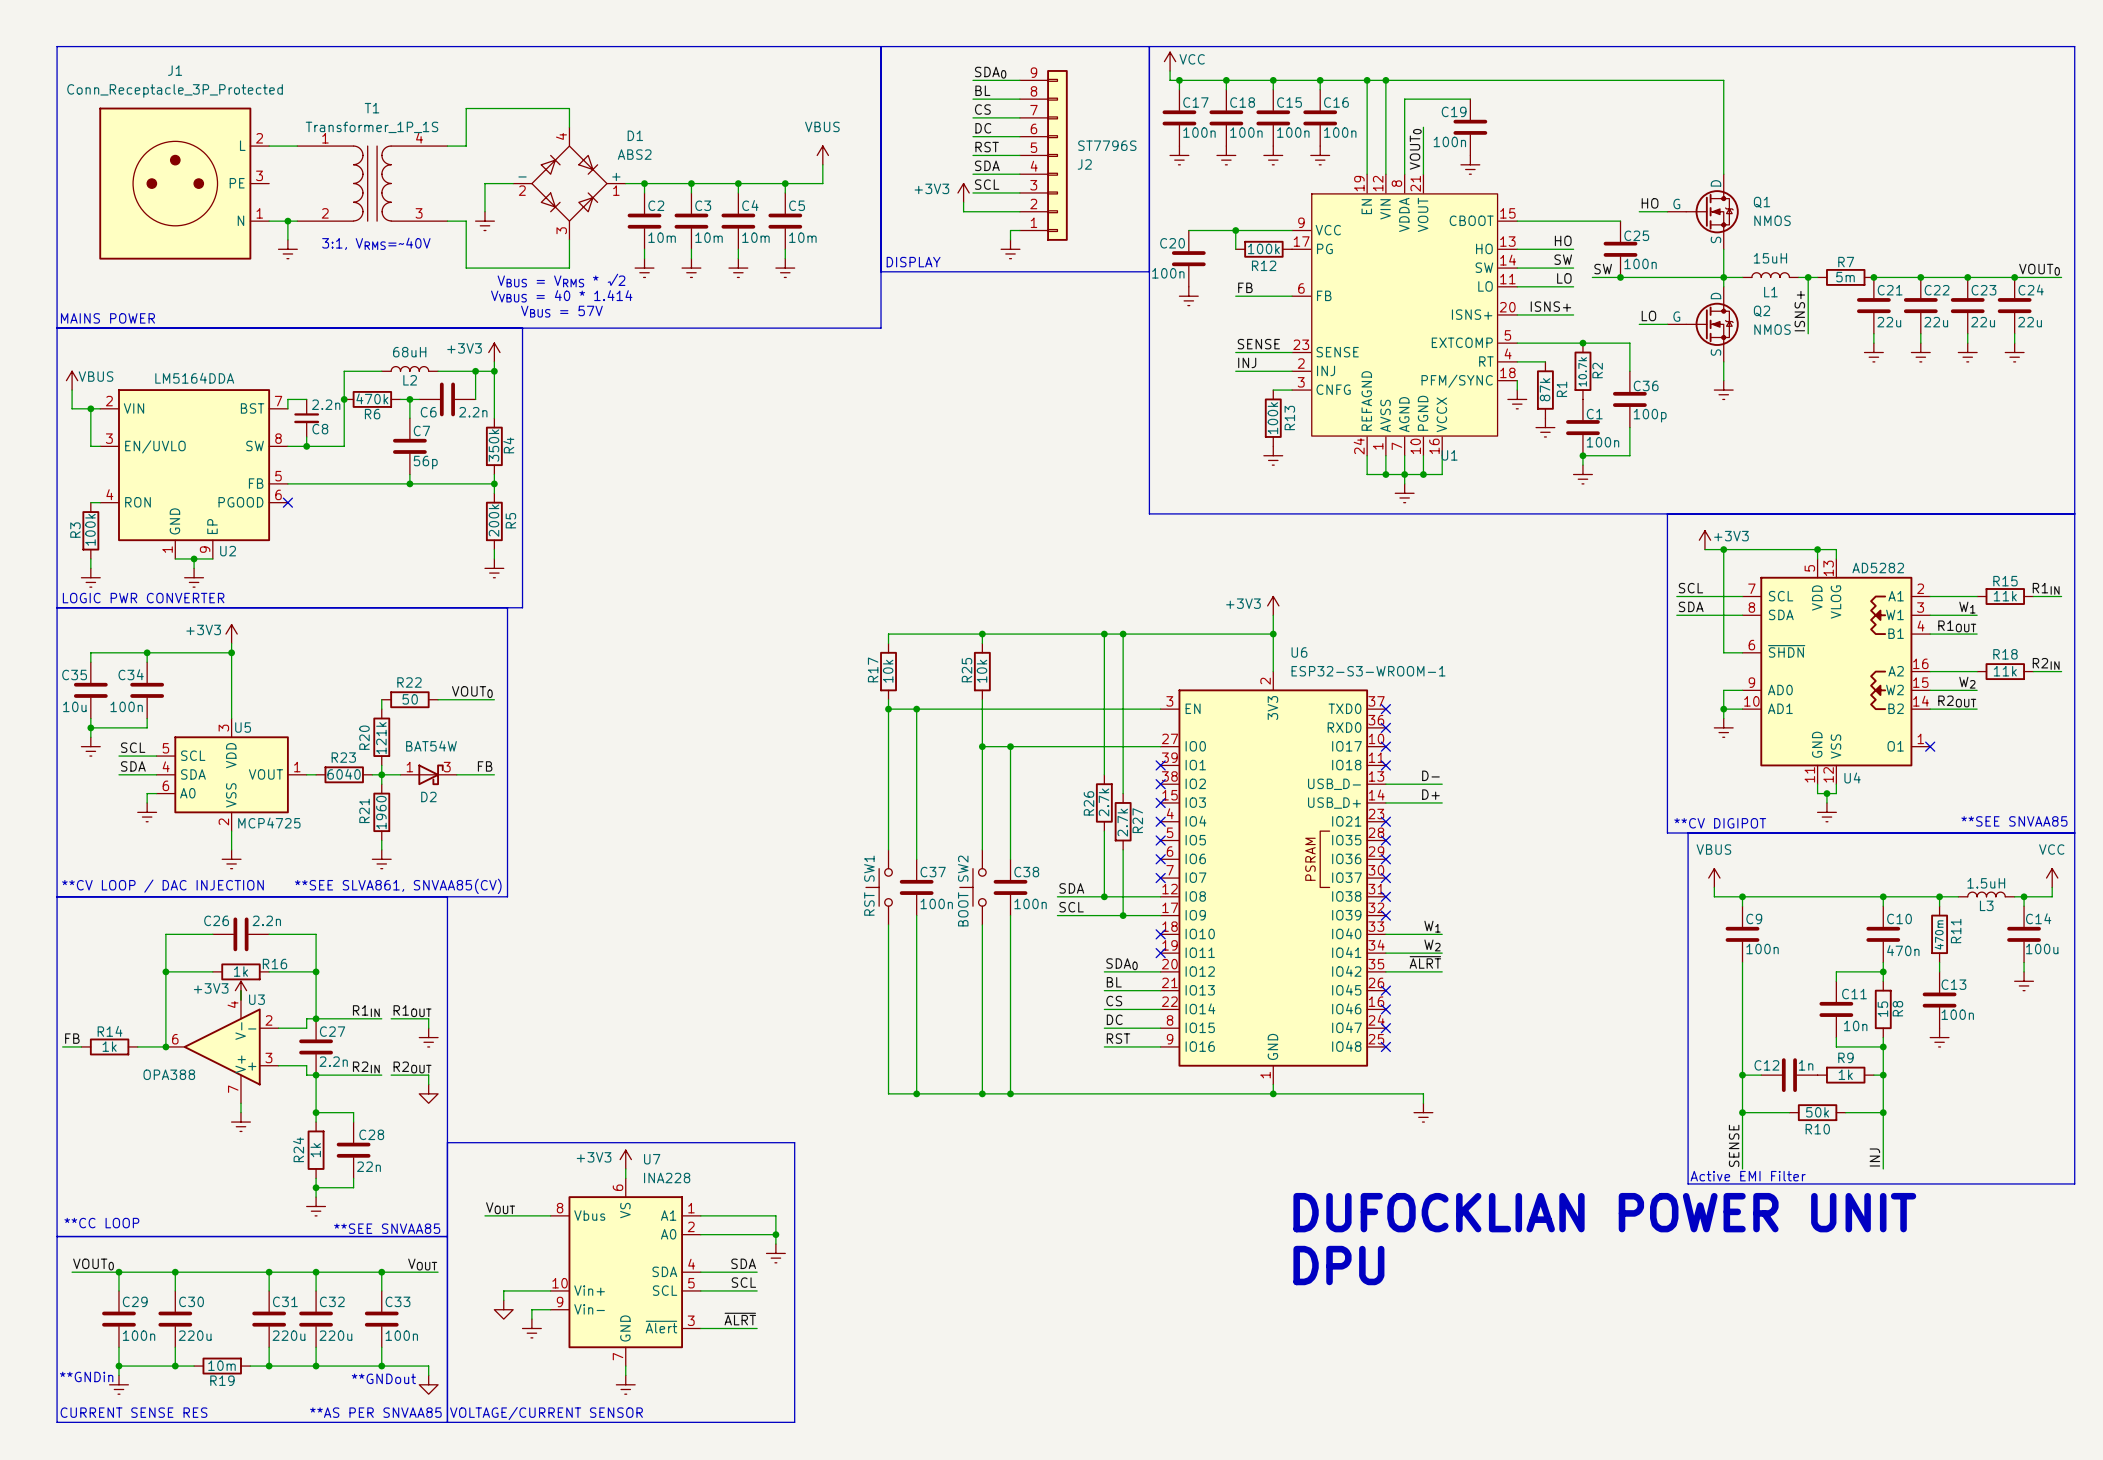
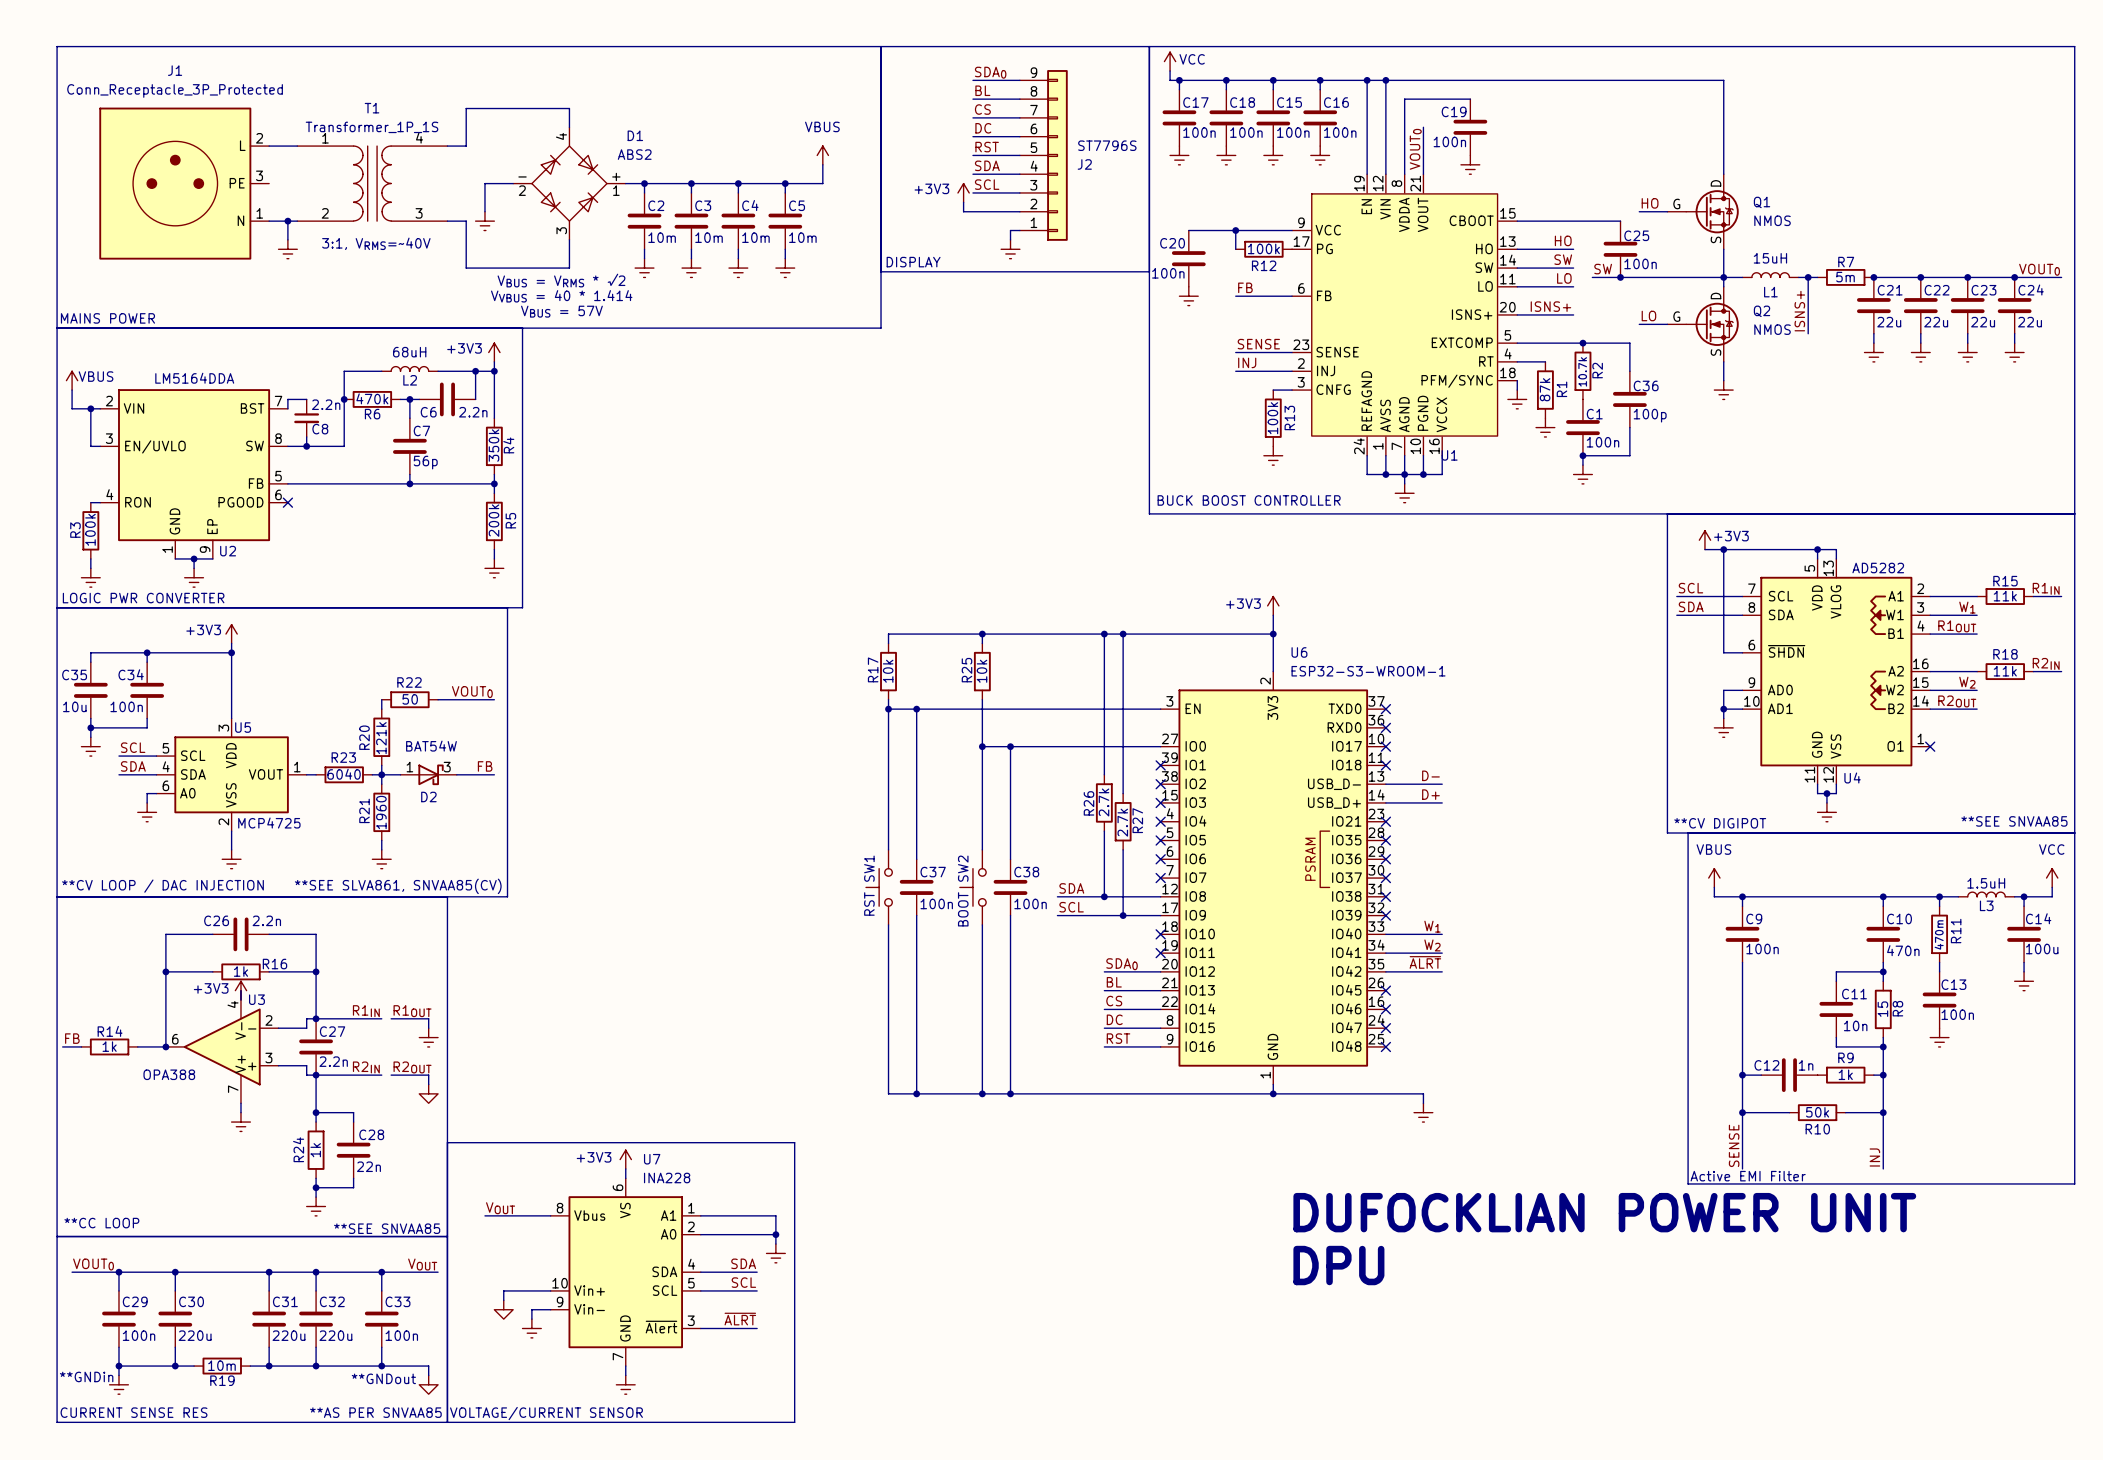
text: none -> BUCK BOOST CONTROLLER (1249, 500)

